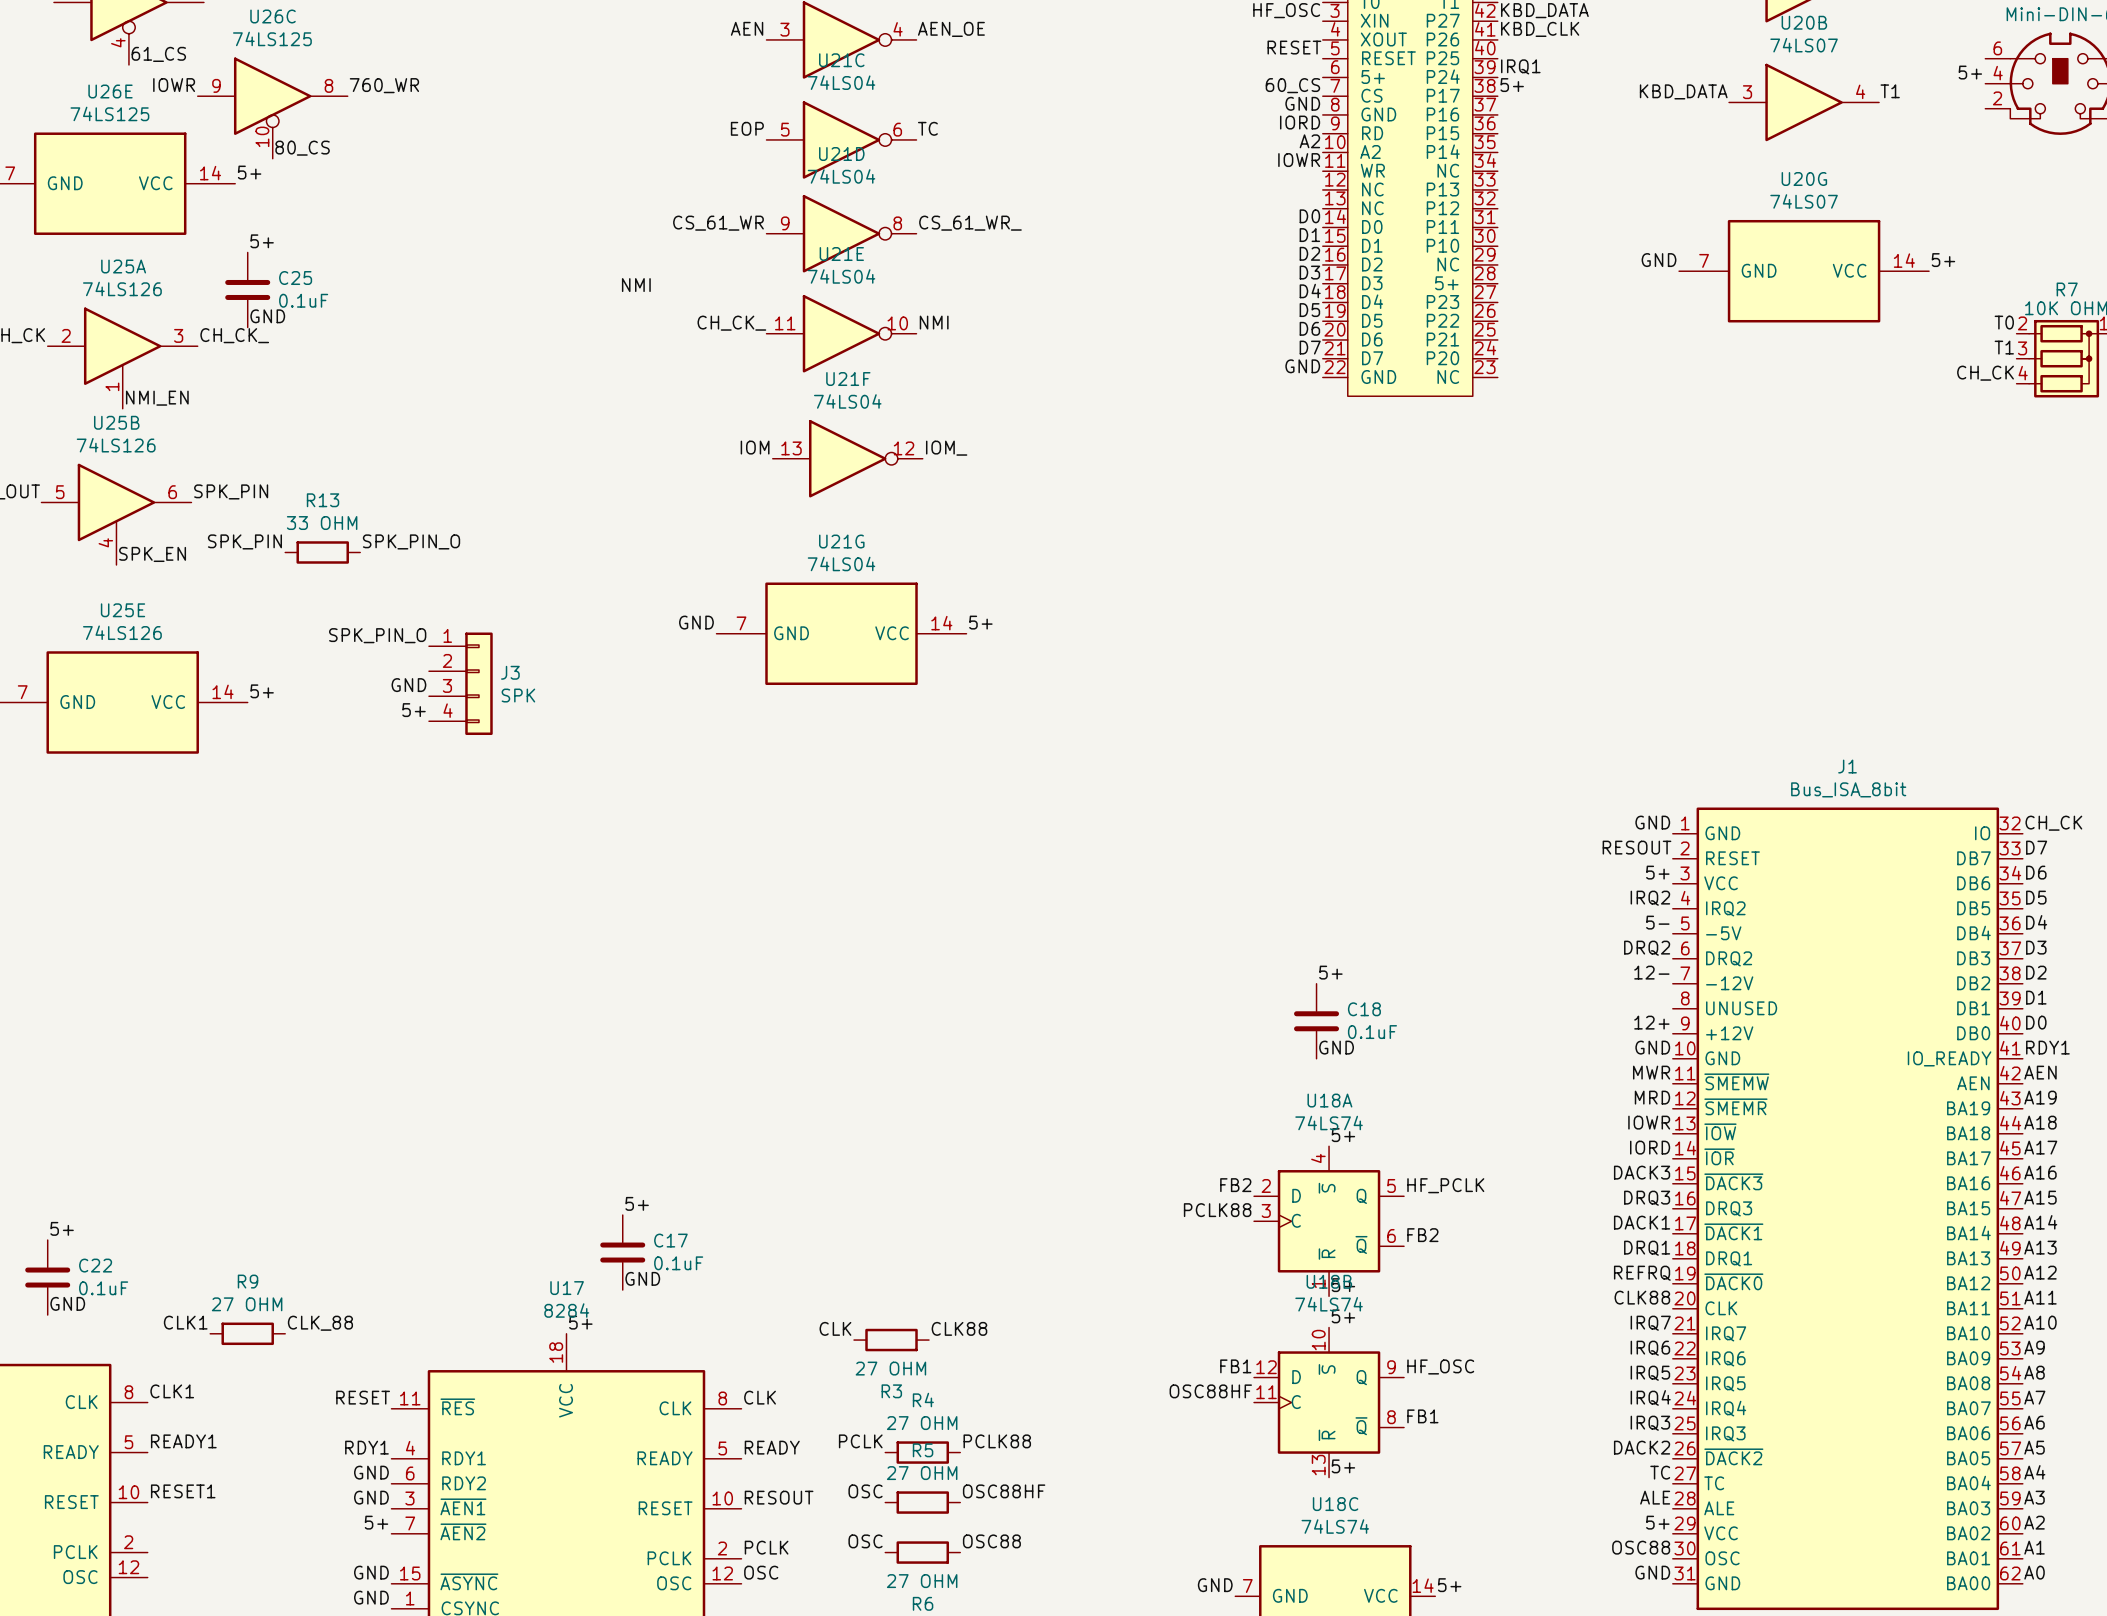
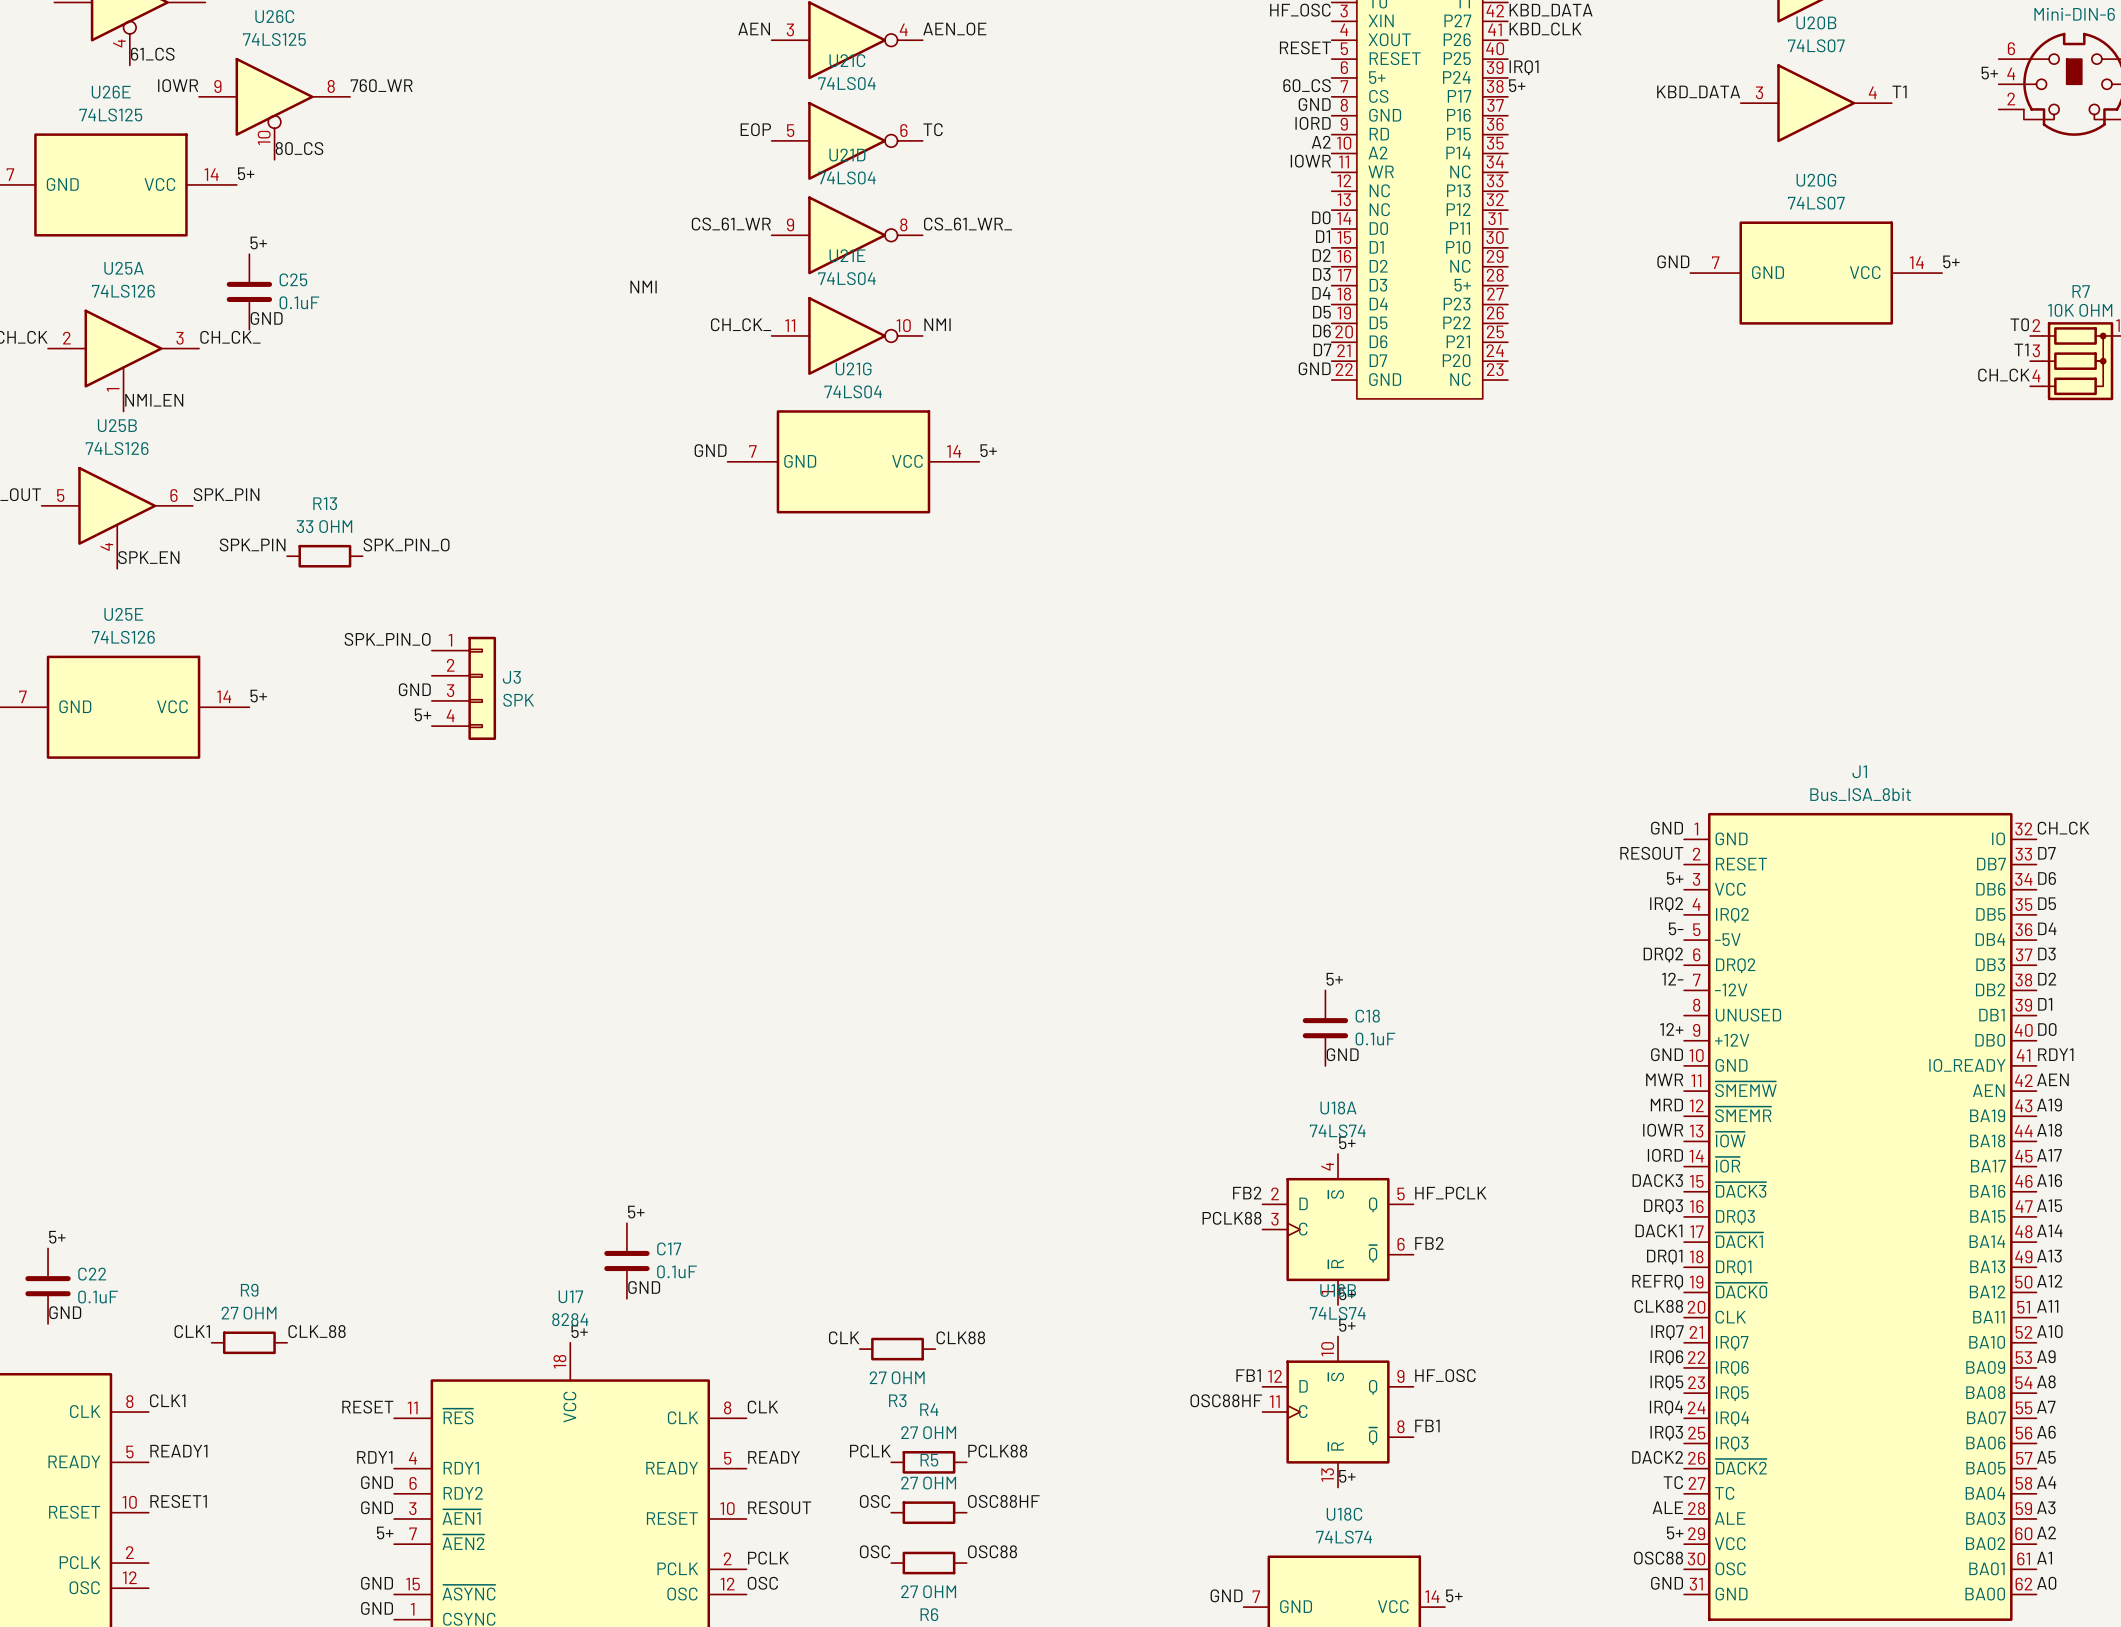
label: IOM (755, 447) -> none
label: IOM_ (946, 448) -> none
U21F: 74LS04 (847, 458) -> none
label position: GND (696, 622) -> GND (710, 450)
label position: 5+ (980, 622) -> 5+ (988, 450)
U21G position: (841, 633) -> (853, 461)

